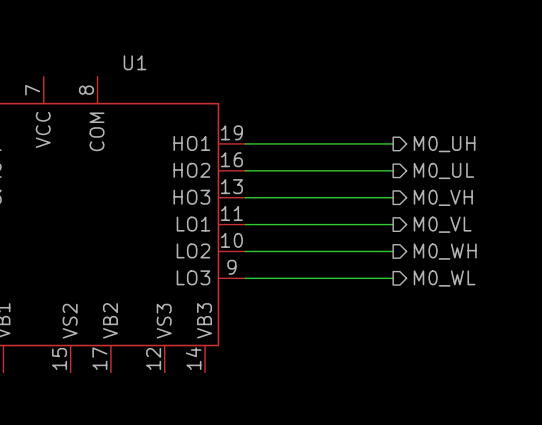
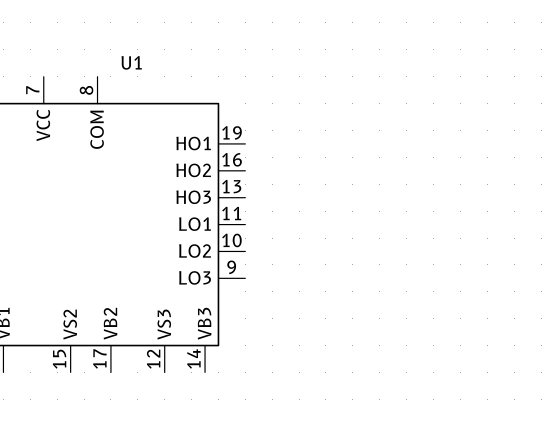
wire: (245, 143) (393, 143) -> none
hierarchical label: M0_UH (444, 144) -> none
wire: (245, 170) (393, 170) -> none
hierarchical label: M0_UL (443, 170) -> none
wire: (245, 197) (393, 197) -> none
hierarchical label: M0_VH (443, 197) -> none
wire: (245, 224) (393, 224) -> none
hierarchical label: M0_VL (442, 224) -> none
wire: (245, 251) (393, 251) -> none
hierarchical label: M0_WH (445, 251) -> none
wire: (245, 278) (393, 278) -> none
hierarchical label: M0_WL (444, 278) -> none

